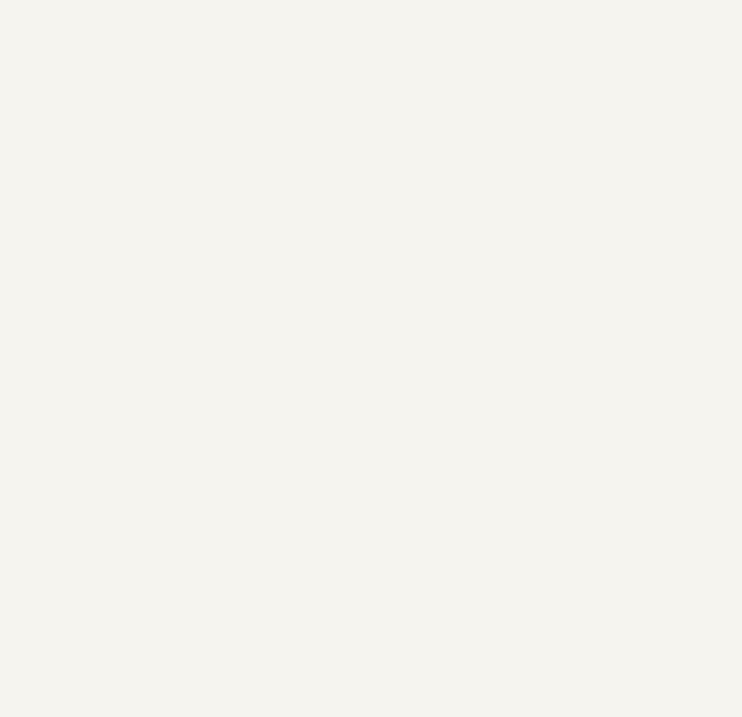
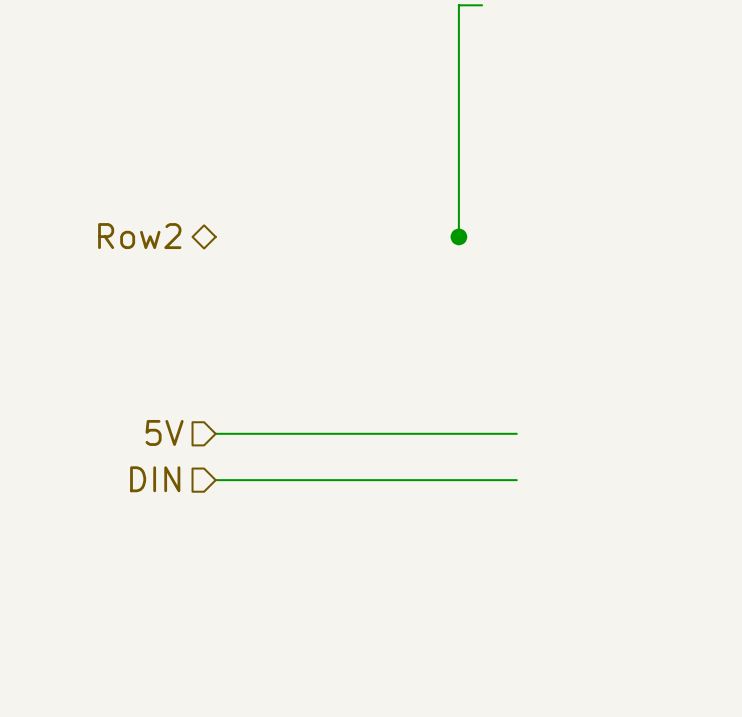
wire: none -> (482, 5) (458, 5) (458, 236)
hierarchical label: none -> Row2 (139, 236)
junction: none -> (458, 236)
hierarchical label: none -> 5V (164, 432)
wire: none -> (215, 433) (516, 433)
hierarchical label: none -> DIN (155, 479)
wire: none -> (215, 480) (516, 480)

